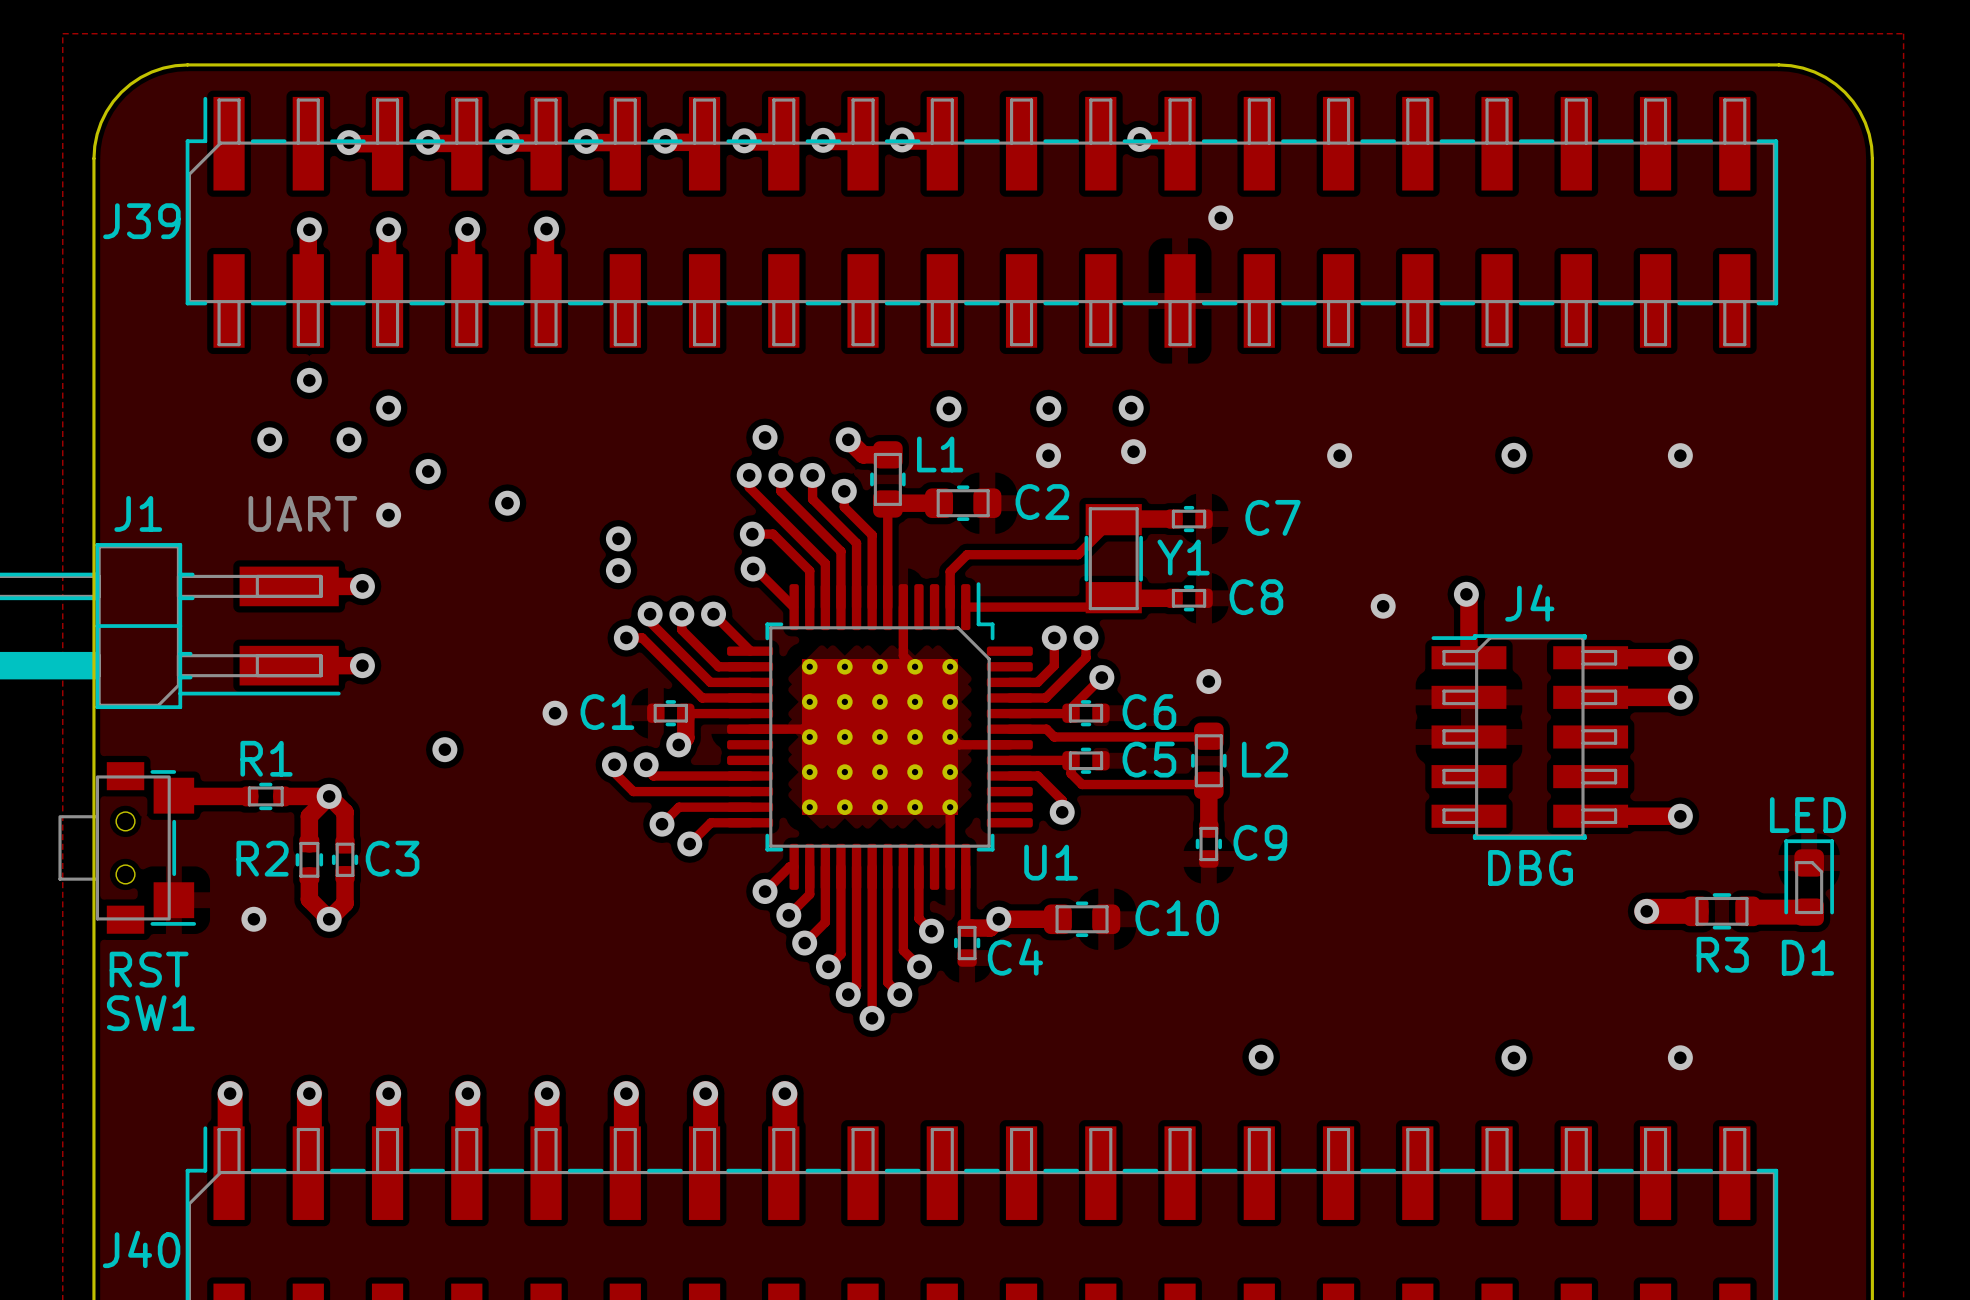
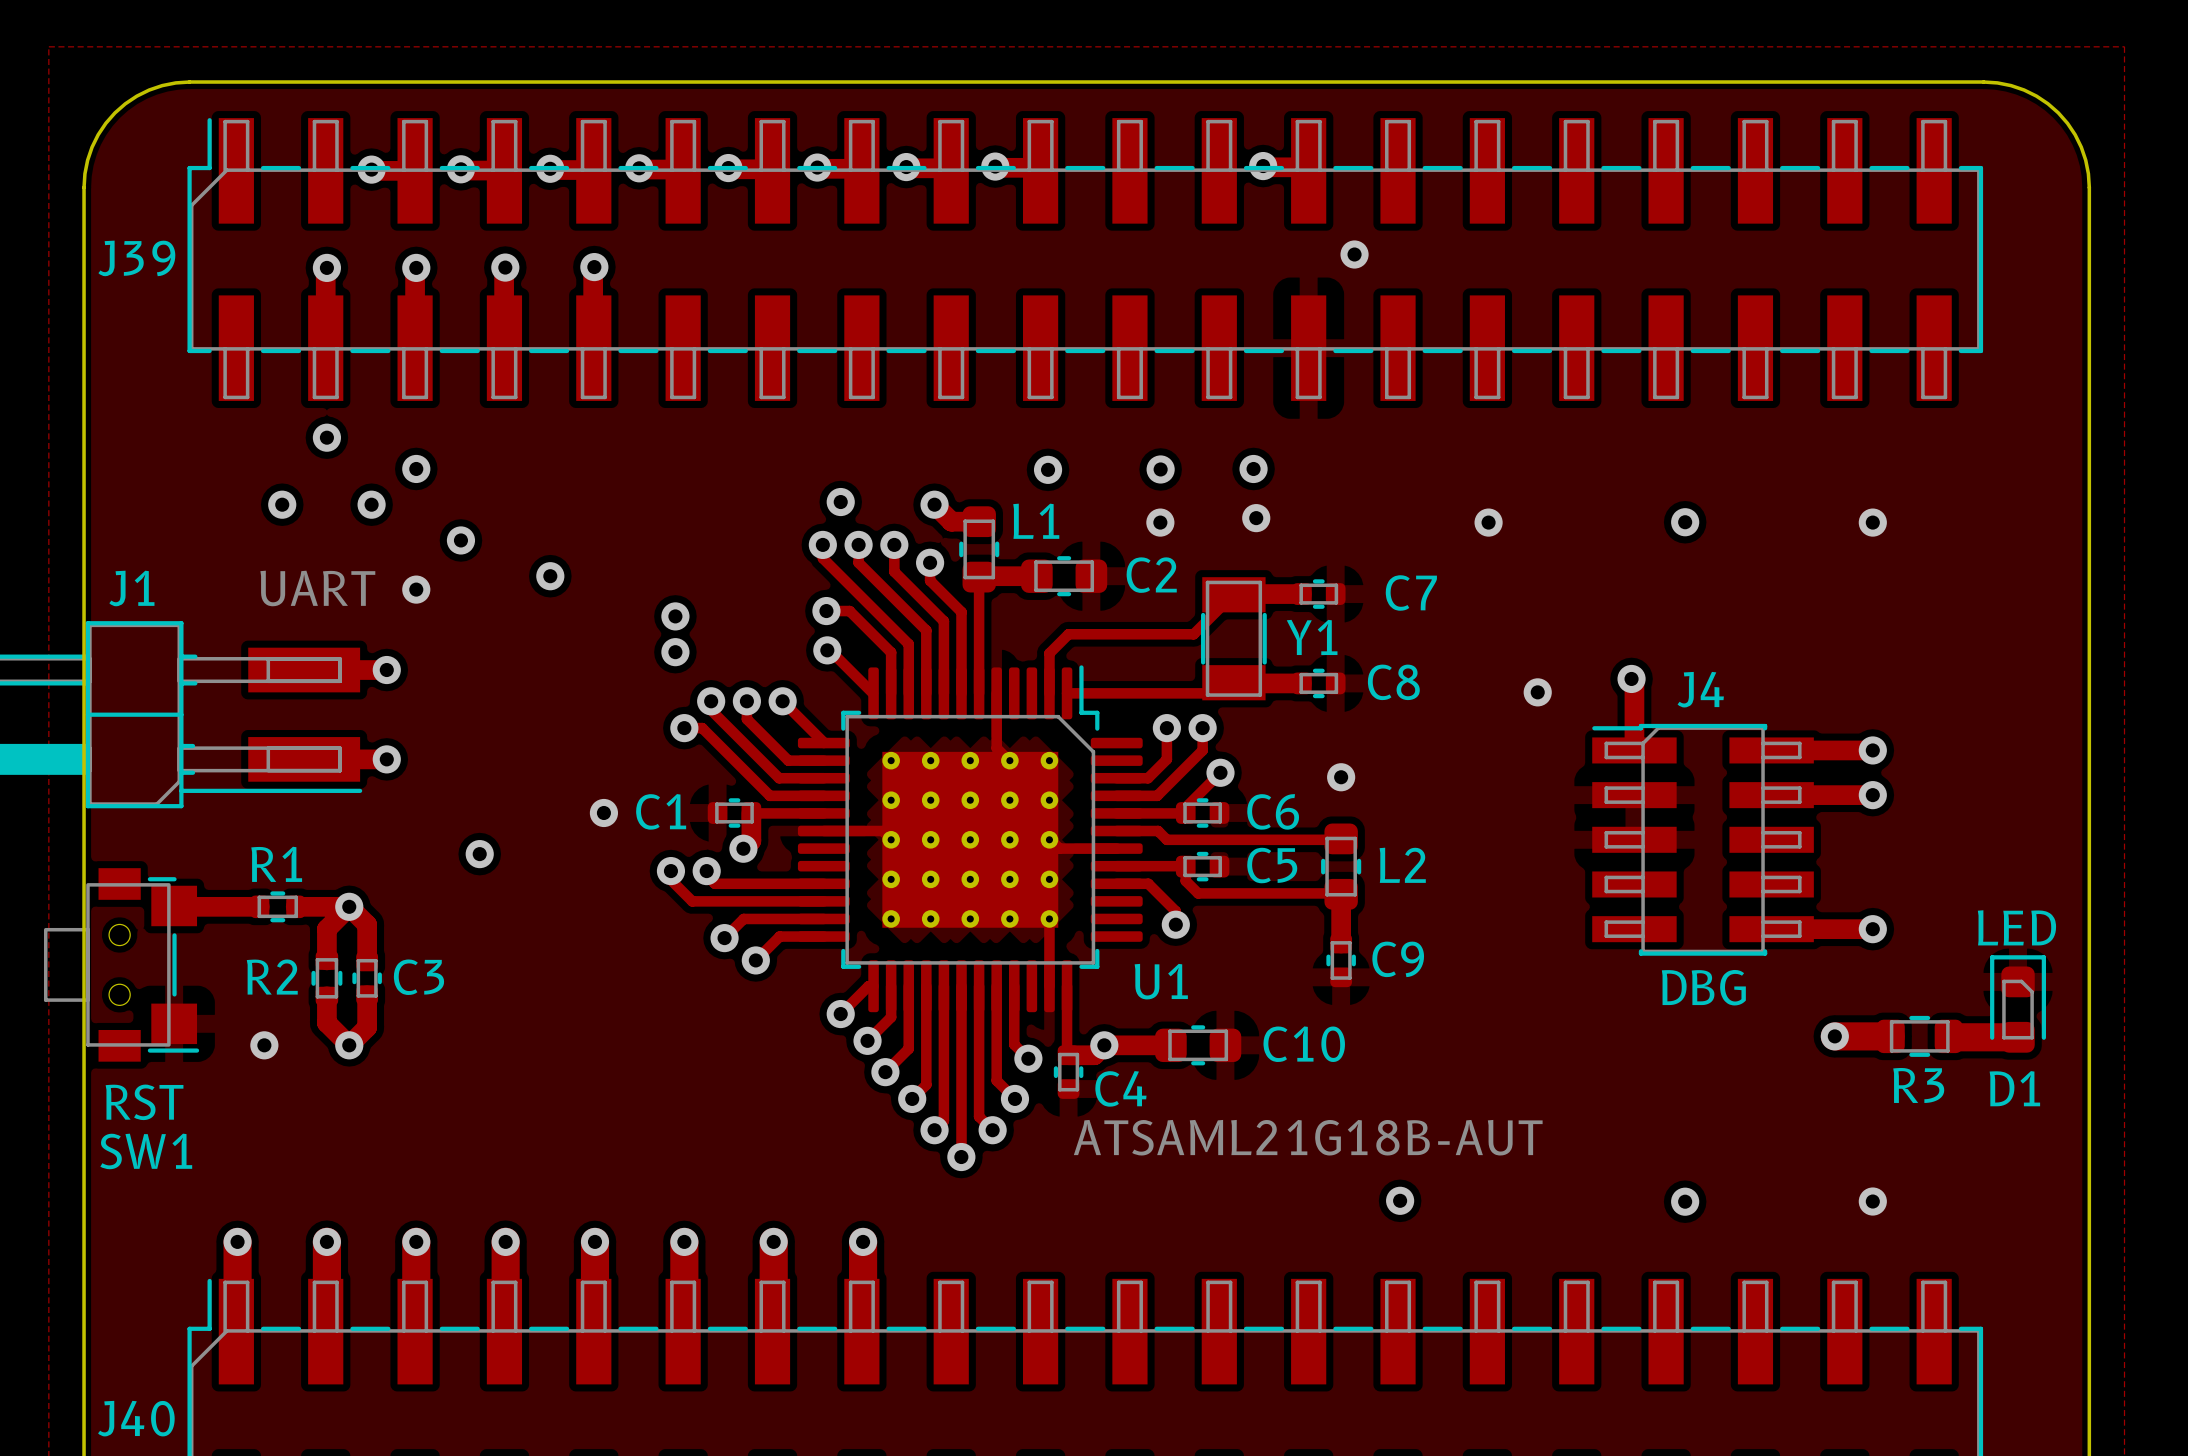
U1 value: none -> ATSAML21G18B-AUT (1308, 1137)

